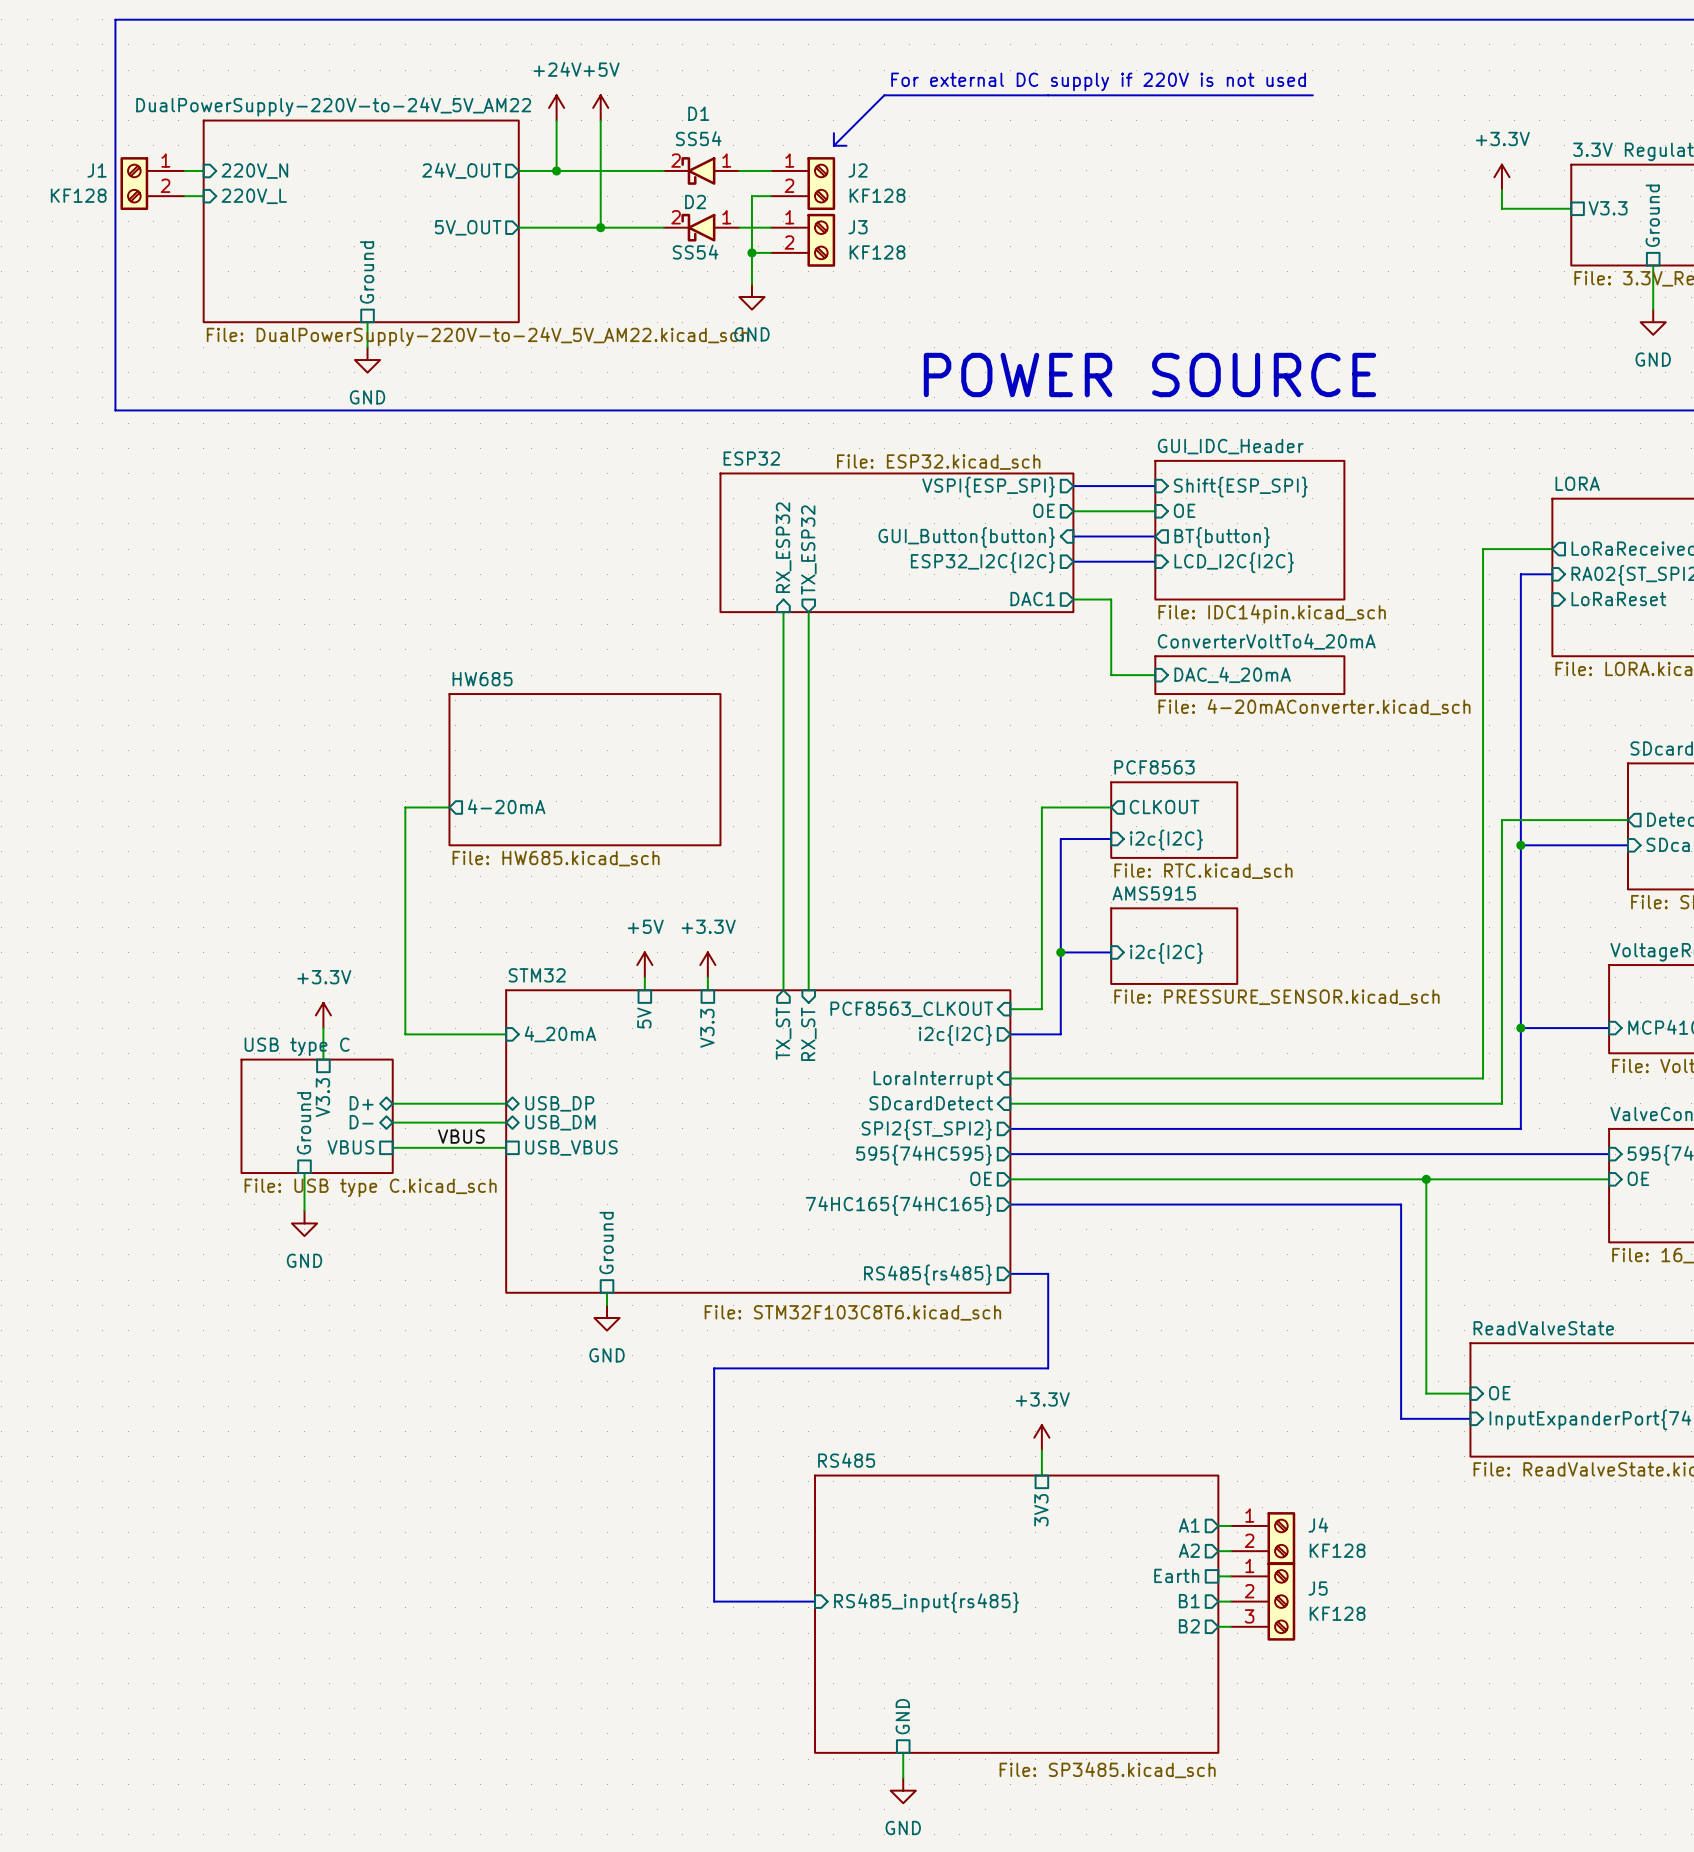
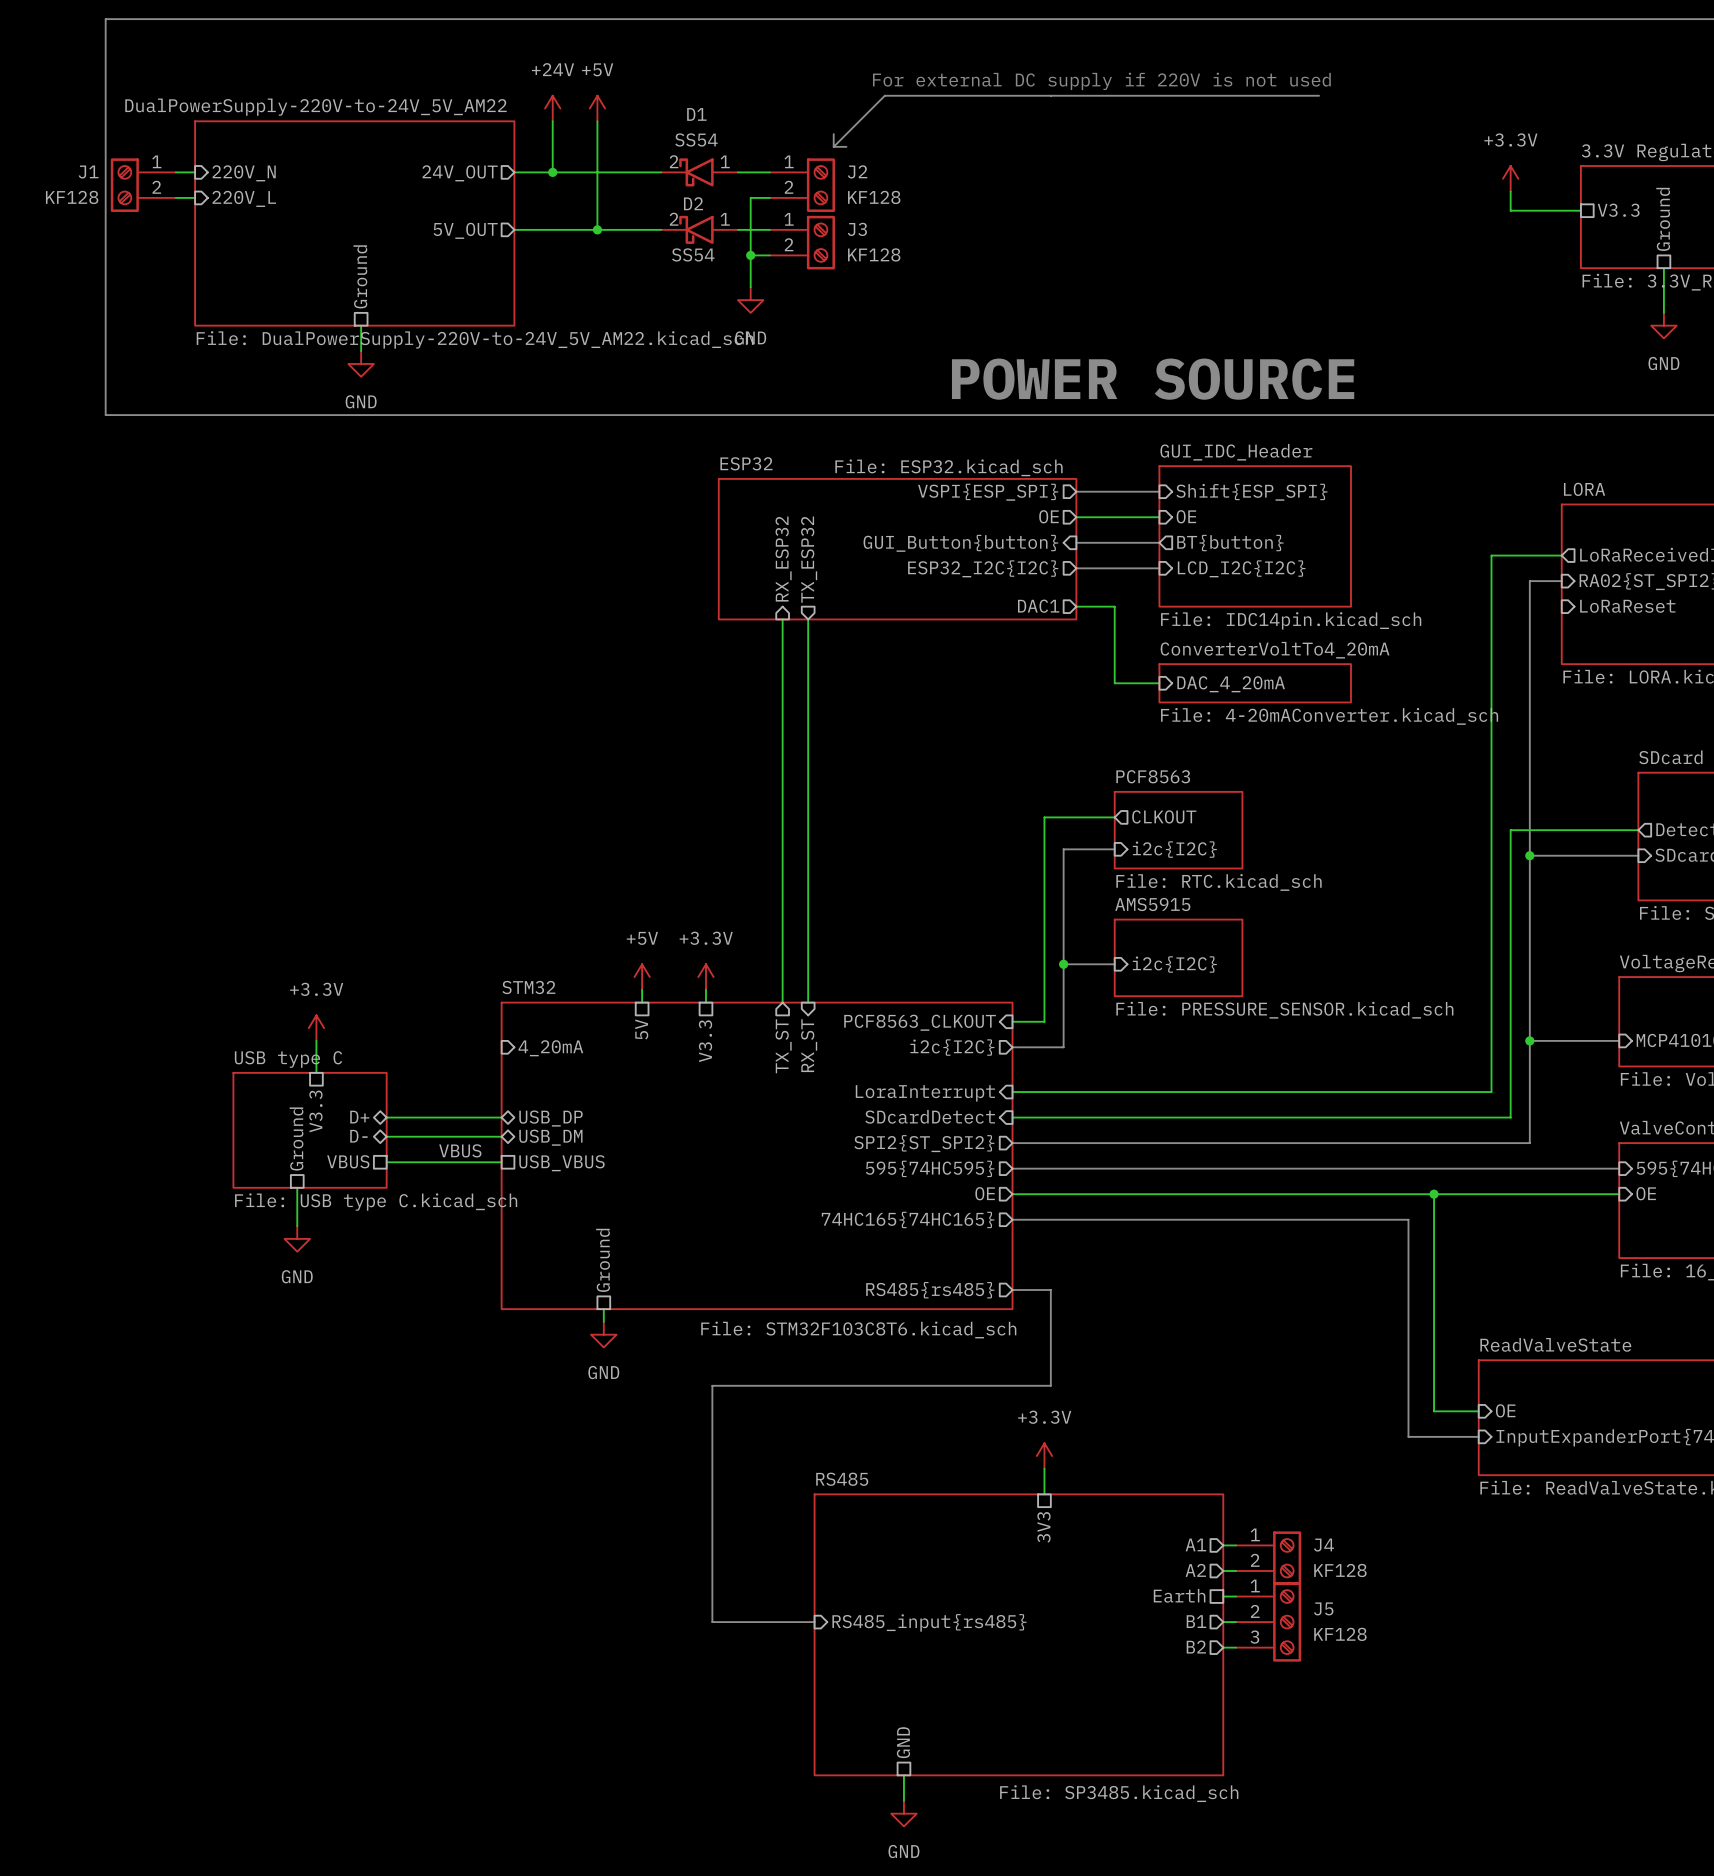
sheet HW685: File: HW685.kicad_sch (584, 769) -> none
sheet pin: 4-20mA (506, 806) -> none
wire: (449, 807) (405, 807) (405, 1034) (506, 1034) -> none

